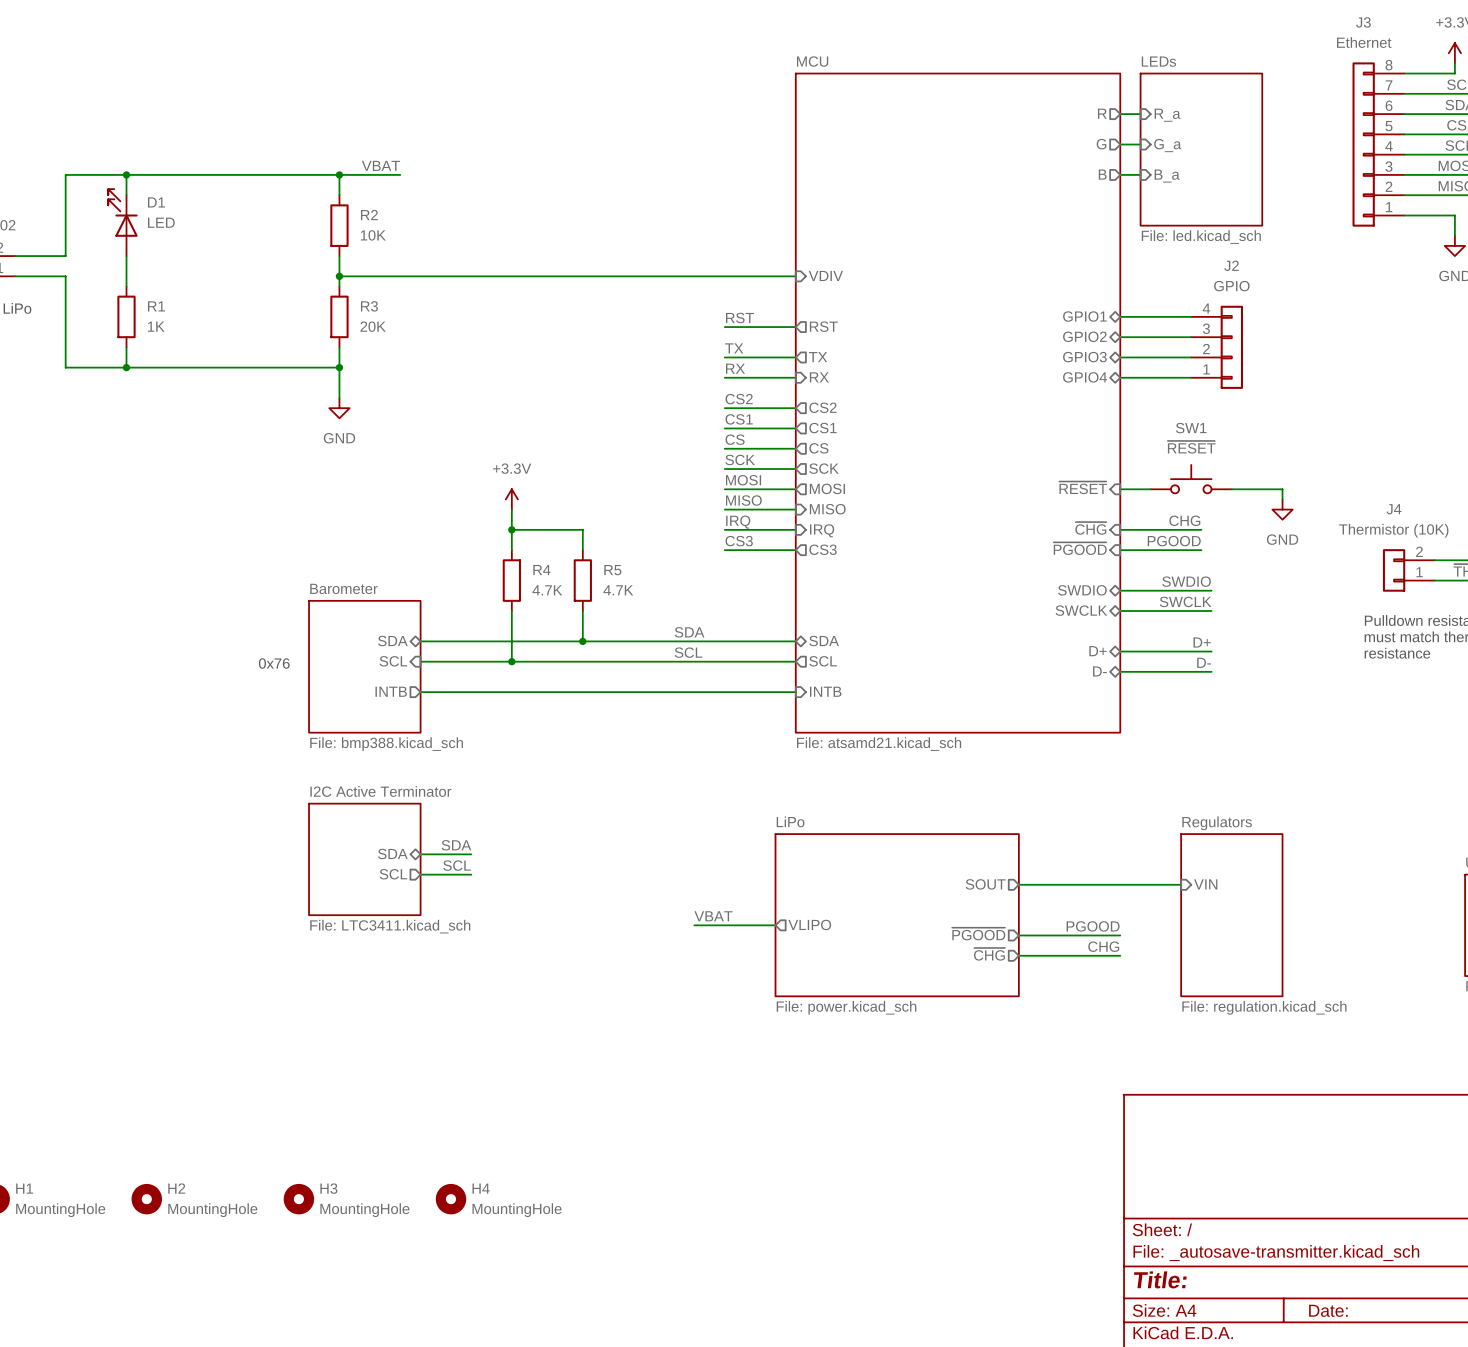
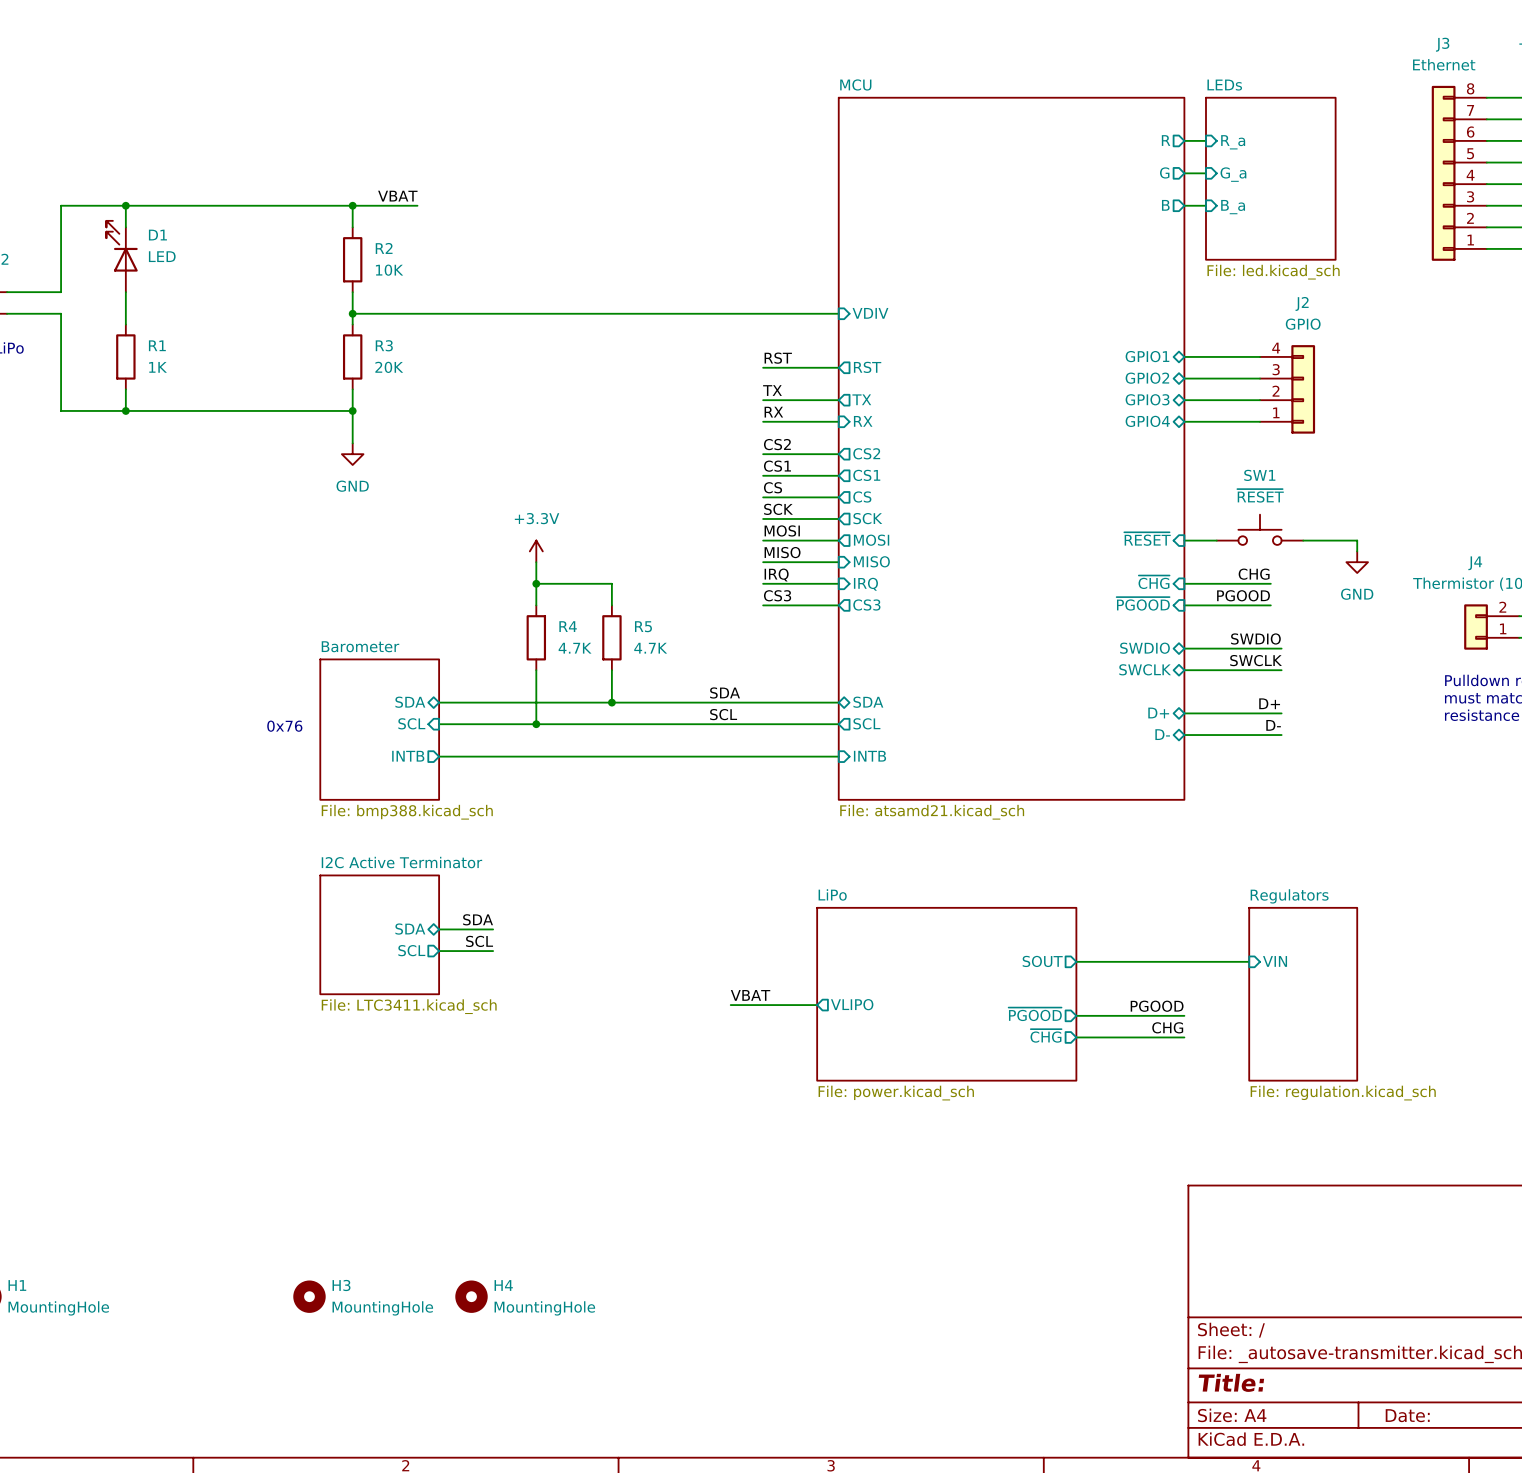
H2: MountingHole (146, 1199) -> none

